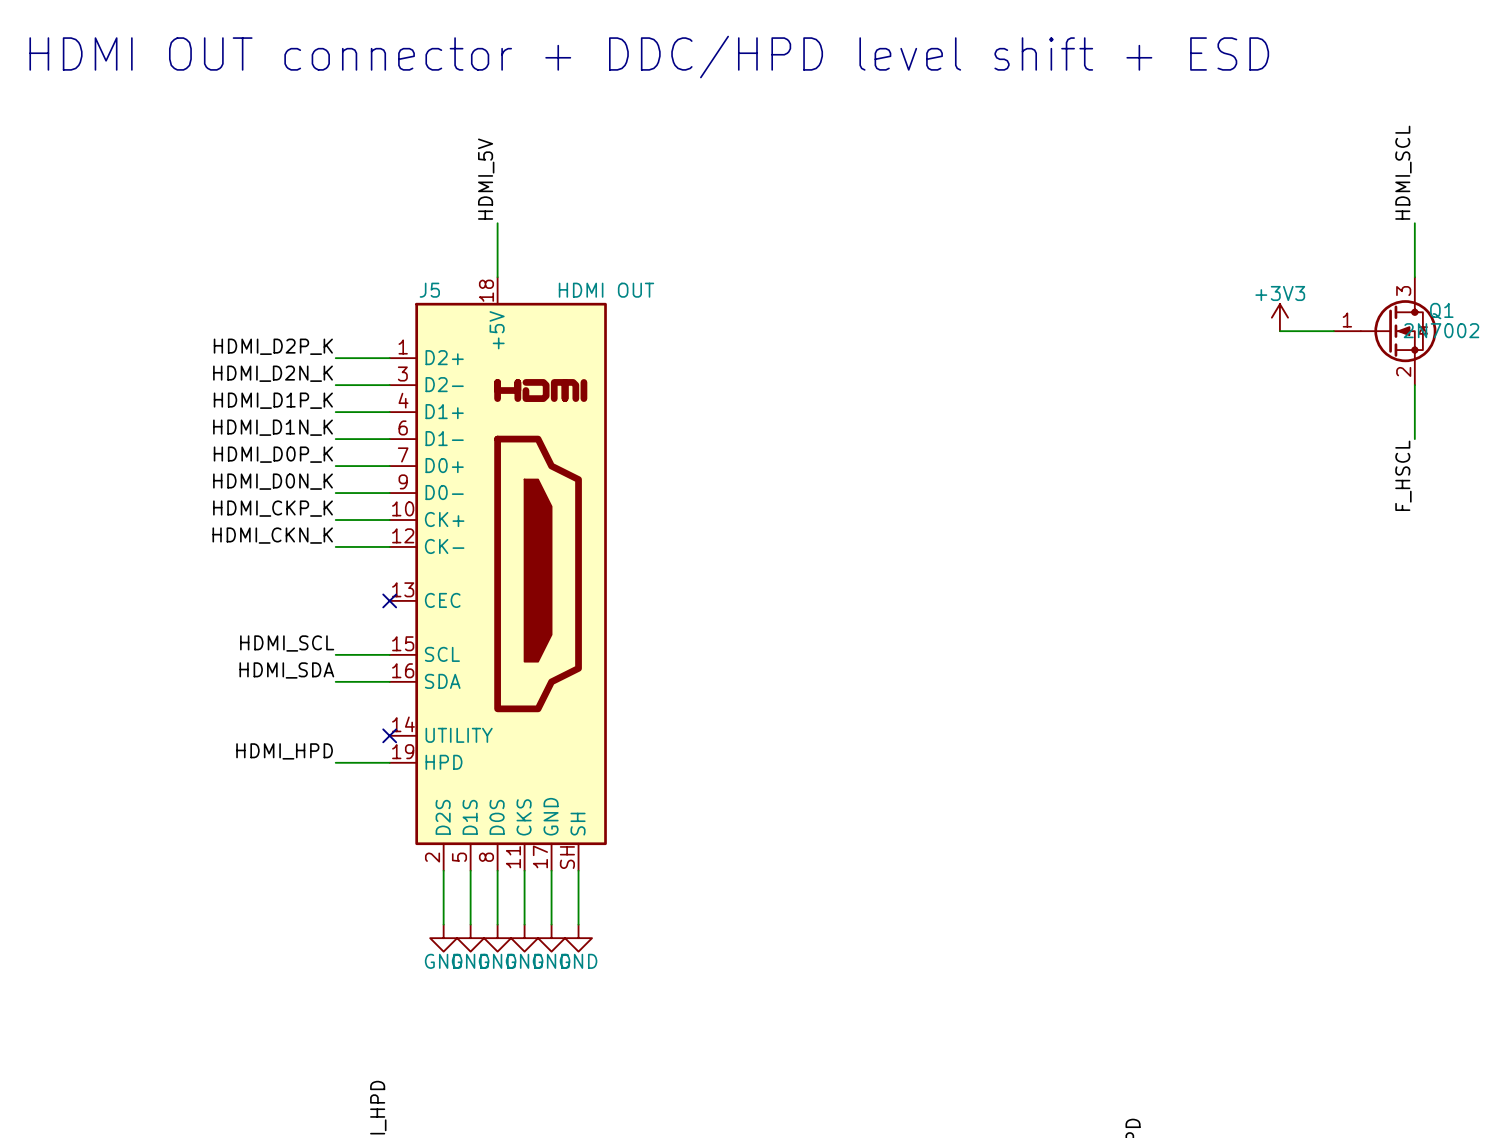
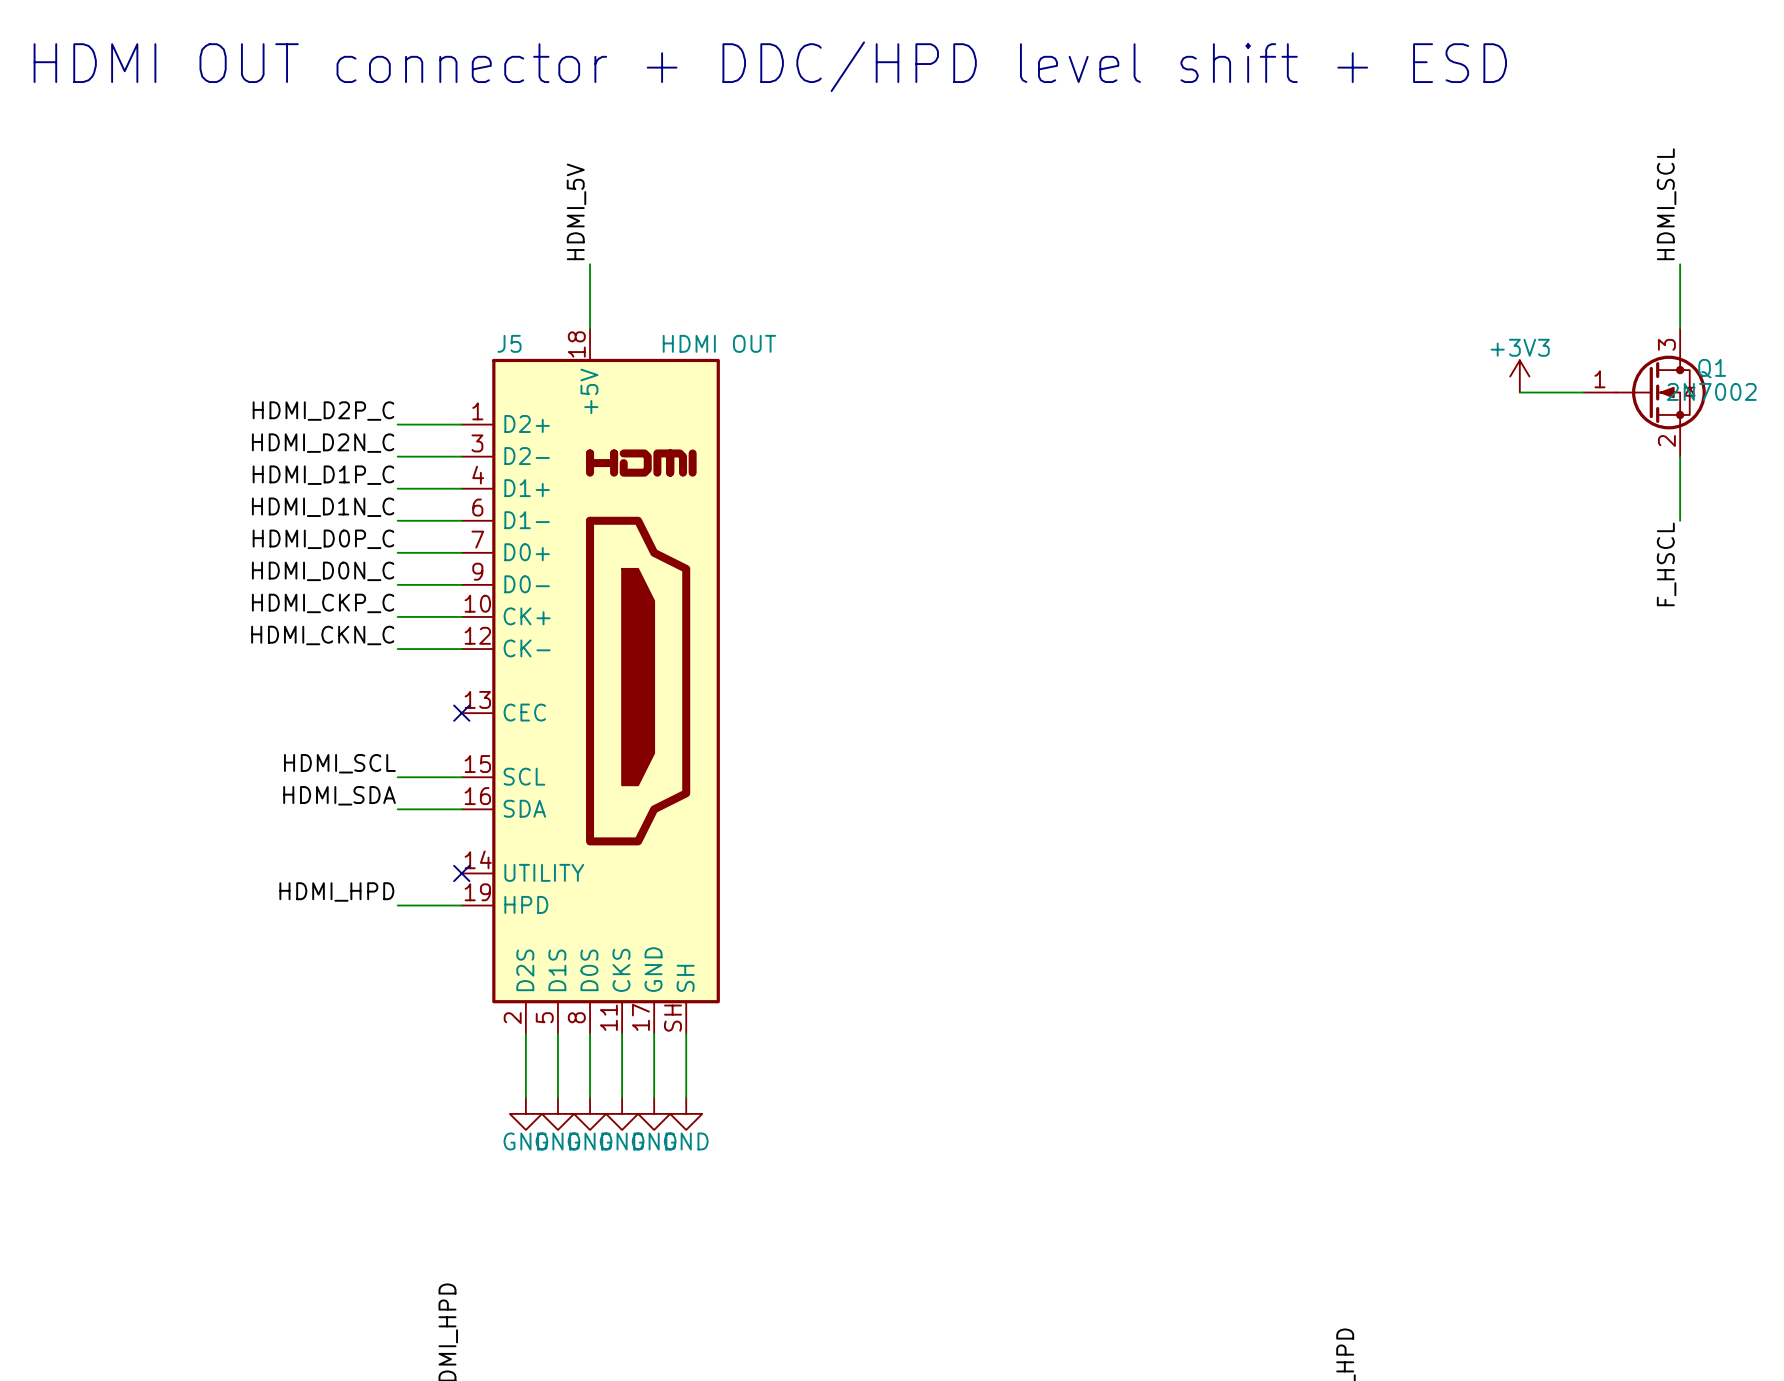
label: HDMI_D2P_K (273, 346) -> HDMI_D2P_C (323, 411)
label: HDMI_D2N_K (273, 373) -> HDMI_D2N_C (323, 443)
label: HDMI_D1P_K (273, 400) -> HDMI_D1P_C (323, 475)
label: HDMI_D1N_K (273, 427) -> HDMI_D1N_C (323, 507)
label: HDMI_D0P_K (273, 454) -> HDMI_D0P_C (323, 539)
label: HDMI_D0N_K (273, 481) -> HDMI_D0N_C (323, 571)
label: HDMI_CKP_K (273, 508) -> HDMI_CKP_C (323, 603)
label: HDMI_CKN_K (272, 535) -> HDMI_CKN_C (322, 635)

